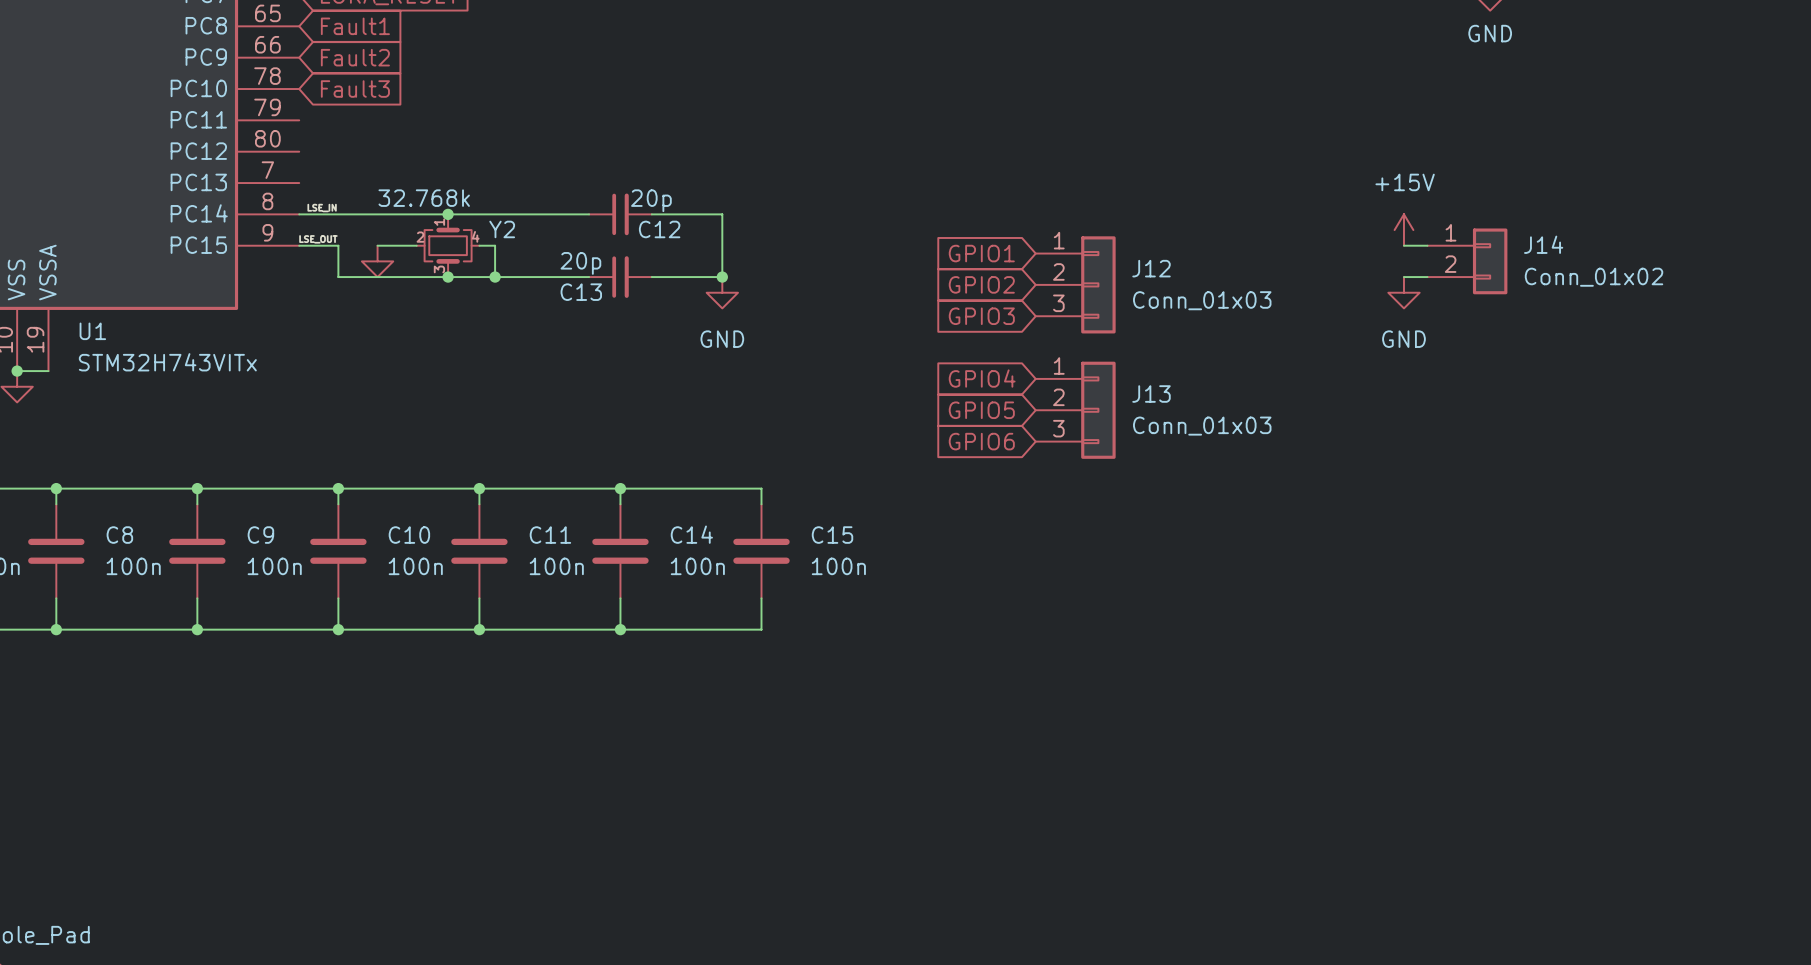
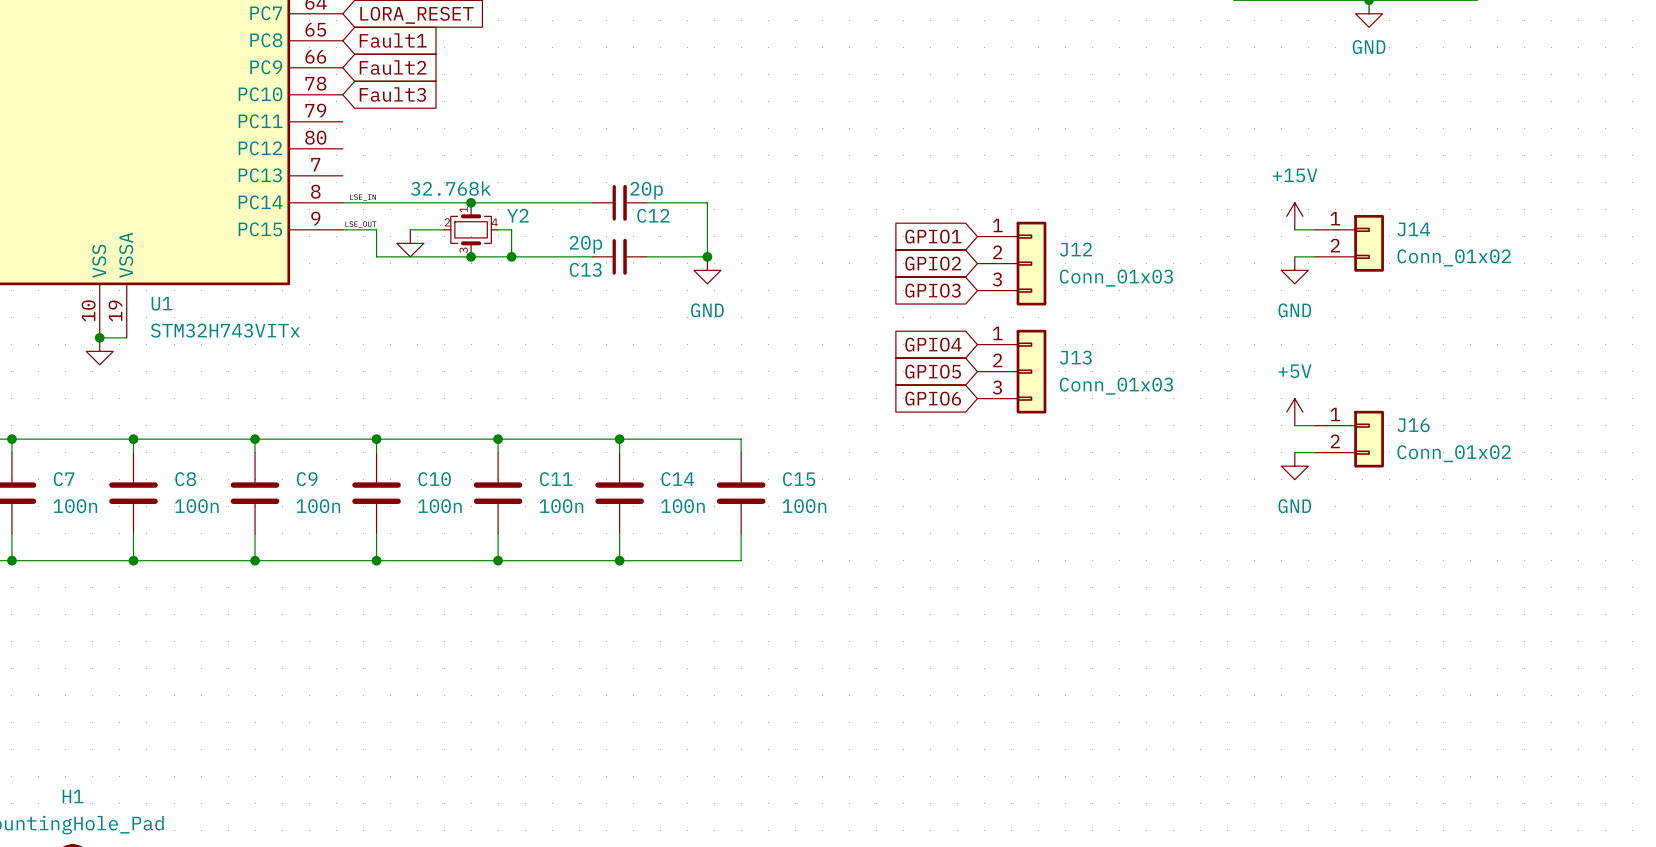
power symbol: none -> +5V (1294, 412)
wire: none -> (1294, 425) (1315, 425)
J16: none -> Conn_01x02 (1349, 439)
wire: none -> (1294, 452) (1315, 452)
power symbol: none -> GND (1294, 466)

